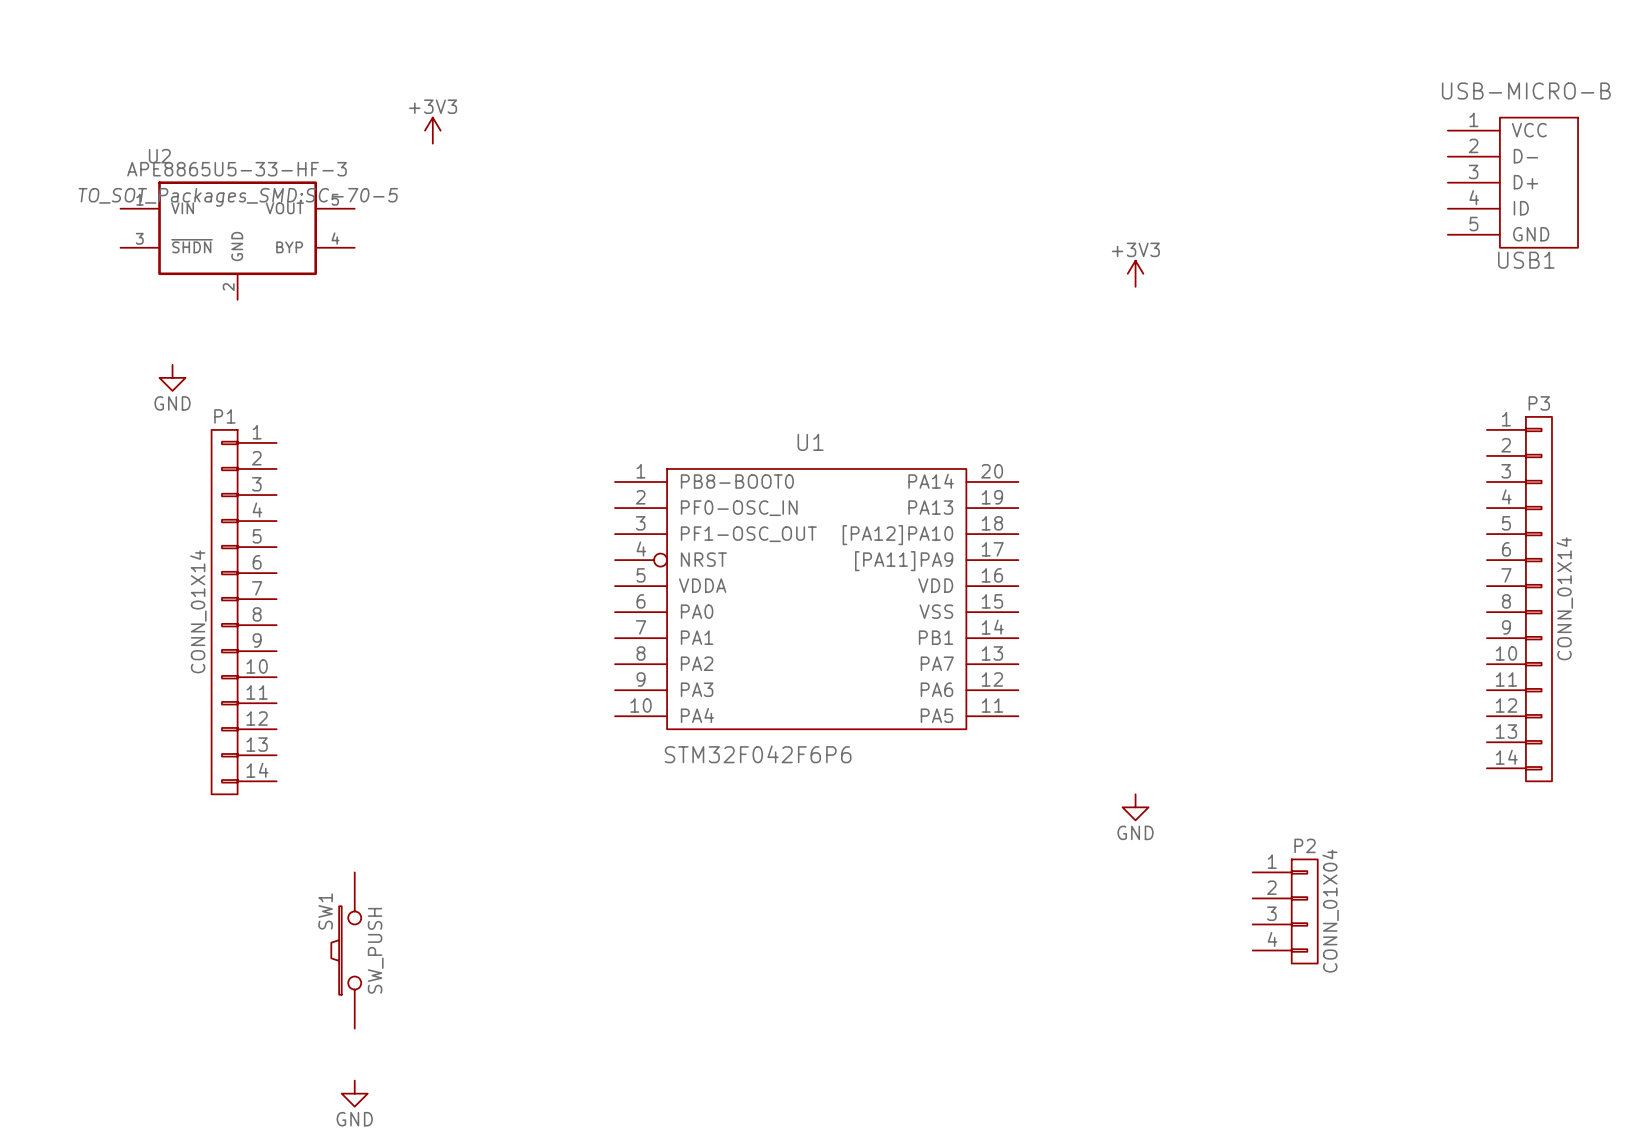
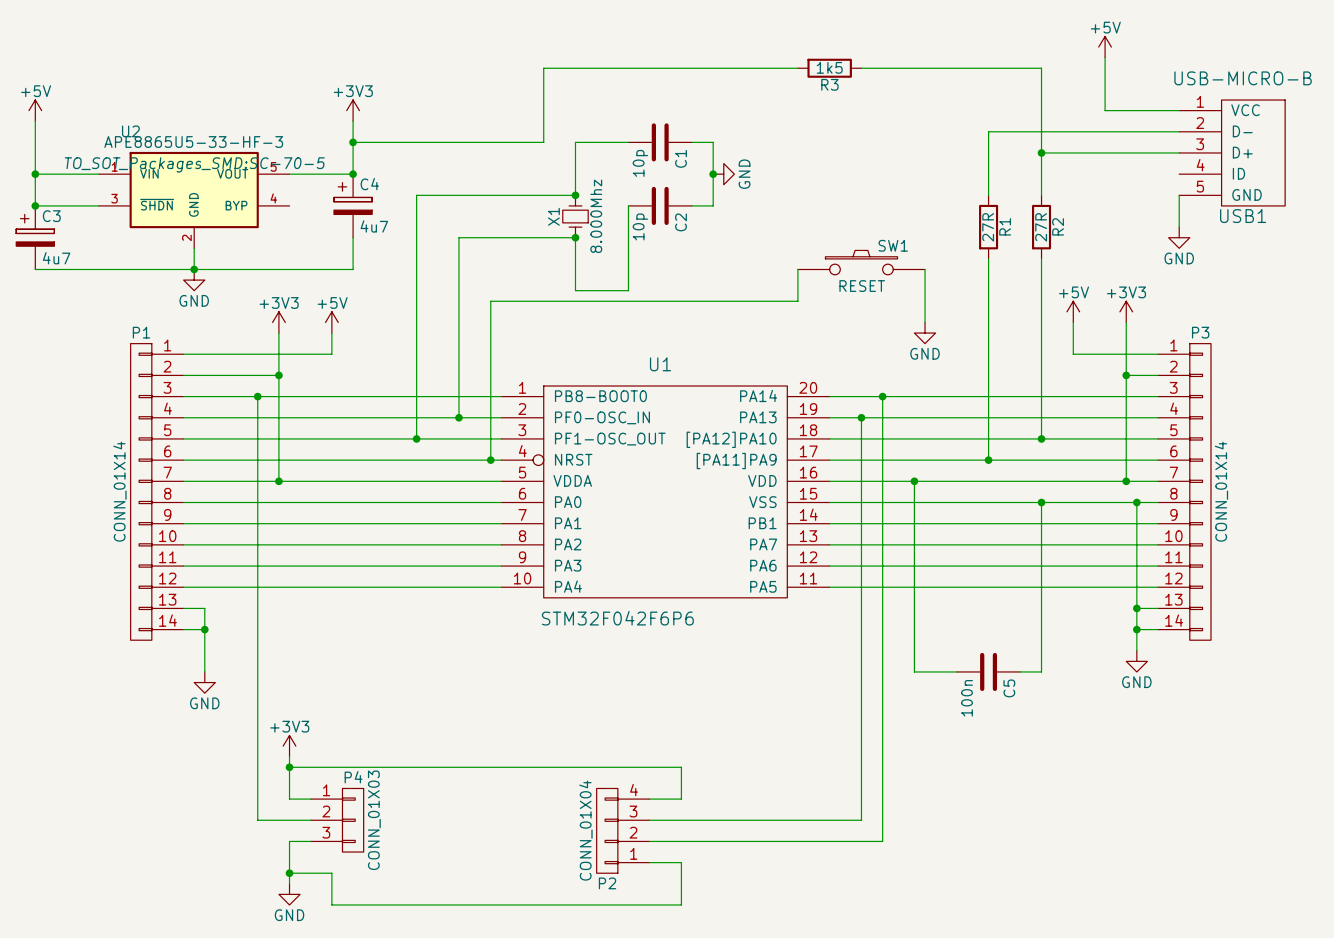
power symbol: none -> +5V (1105, 47)
wire: none -> (1105, 57) (1105, 110) (1179, 110)
wire: none -> (797, 68) (543, 68) (543, 142) (353, 142)
R3: none -> 1k5 (829, 68)
wire: none -> (861, 68) (1041, 68) (1041, 195)
power symbol: none -> +5V (35, 110)
wire: none -> (35, 121) (35, 205) (98, 205)
wire: none -> (353, 121) (353, 174) (289, 174)
wire: none -> (1179, 131) (988, 131) (988, 195)
junction: none -> (353, 142)
wire: none -> (628, 142) (575, 142) (575, 195) (416, 195) (416, 438)
C1: none -> 10p (660, 142)
wire: none -> (692, 142) (713, 142) (713, 205) (692, 205)
wire: none -> (1041, 152) (1179, 152)
junction: none -> (1041, 152)
wire: none -> (35, 174) (98, 174)
junction: none -> (35, 174)
junction: none -> (353, 174)
junction: none -> (713, 174)
power symbol: none -> GND (723, 174)
junction: none -> (575, 195)
wire: none -> (1179, 195) (1179, 227)
junction: none -> (35, 205)
C4: none -> 4u7 (353, 205)
wire: none -> (628, 205) (628, 290) (575, 290) (575, 237) (458, 237) (458, 417)
C2: none -> 10p (660, 205)
X1: none -> 8.000Mhz (575, 216)
power symbol: +3V3 (1135, 273) -> none
R1: none -> 27R (988, 227)
R2: none -> 27R (1041, 227)
C3: none -> 4u7 (35, 237)
wire: none -> (353, 237) (353, 269) (35, 269)
junction: none -> (575, 237)
power symbol: none -> GND (1179, 237)
wire: none -> (194, 248) (194, 269)
wire: none -> (988, 258) (988, 460)
wire: none -> (1041, 258) (1041, 438)
junction: none -> (194, 269)
wire: none -> (797, 269) (797, 301) (490, 301) (490, 460)
wire: none -> (925, 269) (925, 322)
power symbol position: GND (172, 377) -> GND (194, 280)
power symbol: none -> +5V (1073, 311)
power symbol: none -> +3V3 (1126, 311)
power symbol: none -> +3V3 (278, 322)
power symbol: none -> +5V (331, 322)
wire: none -> (1073, 322) (1073, 354) (1158, 354)
wire: none -> (1126, 322) (1126, 481)
wire: none -> (278, 333) (278, 481)
wire: none -> (331, 333) (331, 354) (183, 354)
power symbol: none -> GND (925, 333)
wire: none -> (183, 375) (278, 375)
junction: none -> (278, 375)
wire: none -> (1126, 375) (1158, 375)
junction: none -> (1126, 375)
wire: none -> (183, 396) (501, 396)
wire: none -> (257, 396) (257, 820) (310, 820)
junction: none -> (257, 396)
wire: none -> (829, 396) (1158, 396)
wire: none -> (882, 396) (882, 841) (649, 841)
junction: none -> (882, 396)
wire: none -> (183, 417) (501, 417)
junction: none -> (458, 417)
wire: none -> (829, 417) (1158, 417)
wire: none -> (861, 417) (861, 820) (649, 820)
junction: none -> (861, 417)
wire: none -> (183, 438) (501, 438)
junction: none -> (416, 438)
wire: none -> (829, 438) (1158, 438)
junction: none -> (1041, 438)
wire: none -> (183, 460) (501, 460)
junction: none -> (490, 460)
wire: none -> (829, 460) (1158, 460)
junction: none -> (988, 460)
wire: none -> (183, 481) (501, 481)
junction: none -> (278, 481)
wire: none -> (829, 481) (1158, 481)
wire: none -> (914, 481) (914, 671) (956, 671)
junction: none -> (914, 481)
junction: none -> (1126, 481)
P3 position: (1519, 599) -> (1184, 491)
wire: none -> (183, 502) (501, 502)
P1 position: (244, 612) -> (157, 491)
wire: none -> (829, 502) (1158, 502)
wire: none -> (1041, 502) (1041, 671) (1020, 671)
junction: none -> (1041, 502)
wire: none -> (1136, 502) (1136, 650)
junction: none -> (1136, 502)
wire: none -> (183, 523) (501, 523)
wire: none -> (829, 523) (1158, 523)
wire: none -> (183, 544) (501, 544)
wire: none -> (829, 544) (1158, 544)
wire: none -> (183, 566) (501, 566)
wire: none -> (829, 566) (1158, 566)
wire: none -> (183, 587) (501, 587)
wire: none -> (829, 587) (1158, 587)
wire: none -> (183, 608) (204, 608) (204, 671)
wire: none -> (1136, 608) (1158, 608)
junction: none -> (1136, 608)
wire: none -> (183, 629) (204, 629)
junction: none -> (204, 629)
wire: none -> (1136, 629) (1158, 629)
junction: none -> (1136, 629)
power symbol: GND (1135, 807) -> none
power symbol: none -> GND (1136, 661)
C5: none -> 100n (988, 671)
power symbol: none -> GND (204, 682)
power symbol: none -> +3V3 (289, 746)
P2 position: (1285, 911) -> (623, 830)
P2 rotation: 0° (1304, 911) -> 180° (607, 830)
wire: none -> (289, 756) (289, 799) (310, 799)
wire: none -> (289, 767) (681, 767) (681, 799) (649, 799)
junction: none -> (289, 767)
SW1 rotation: 0° (336, 950) -> 90° clockwise (861, 254)
SW1 position: (346, 950) -> (861, 262)
SW1 value: SW_PUSH (375, 950) -> RESET (862, 286)
P4: none -> CONN_01X03 (337, 820)
wire: none -> (310, 841) (289, 841) (289, 883)
wire: none -> (649, 862) (681, 862) (681, 904) (331, 904) (331, 873) (289, 873)
junction: none -> (289, 873)

